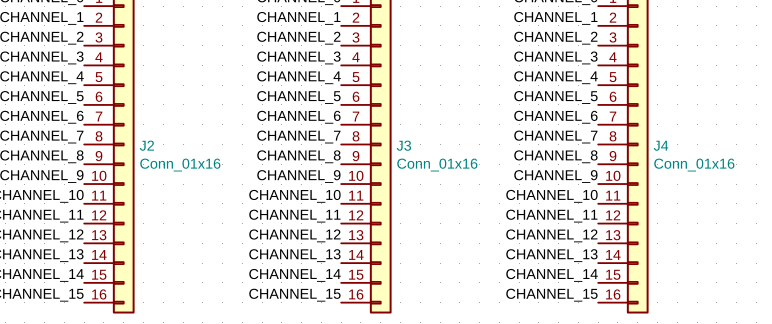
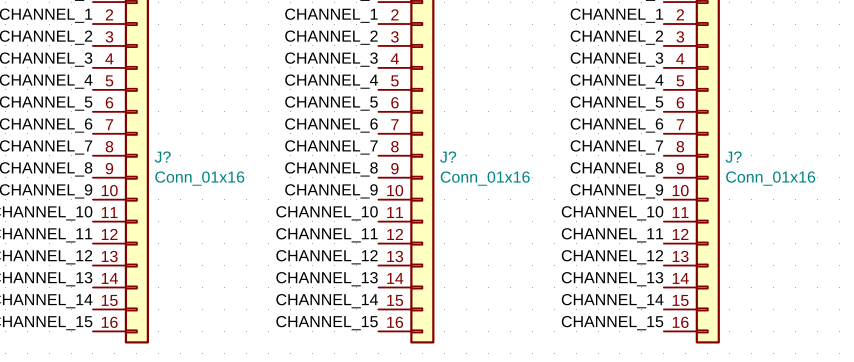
J2 name: J2 (146, 145) -> J? (162, 157)
J3 name: J3 (403, 145) -> J? (448, 157)
J4 name: J4 (661, 145) -> J? (733, 157)

